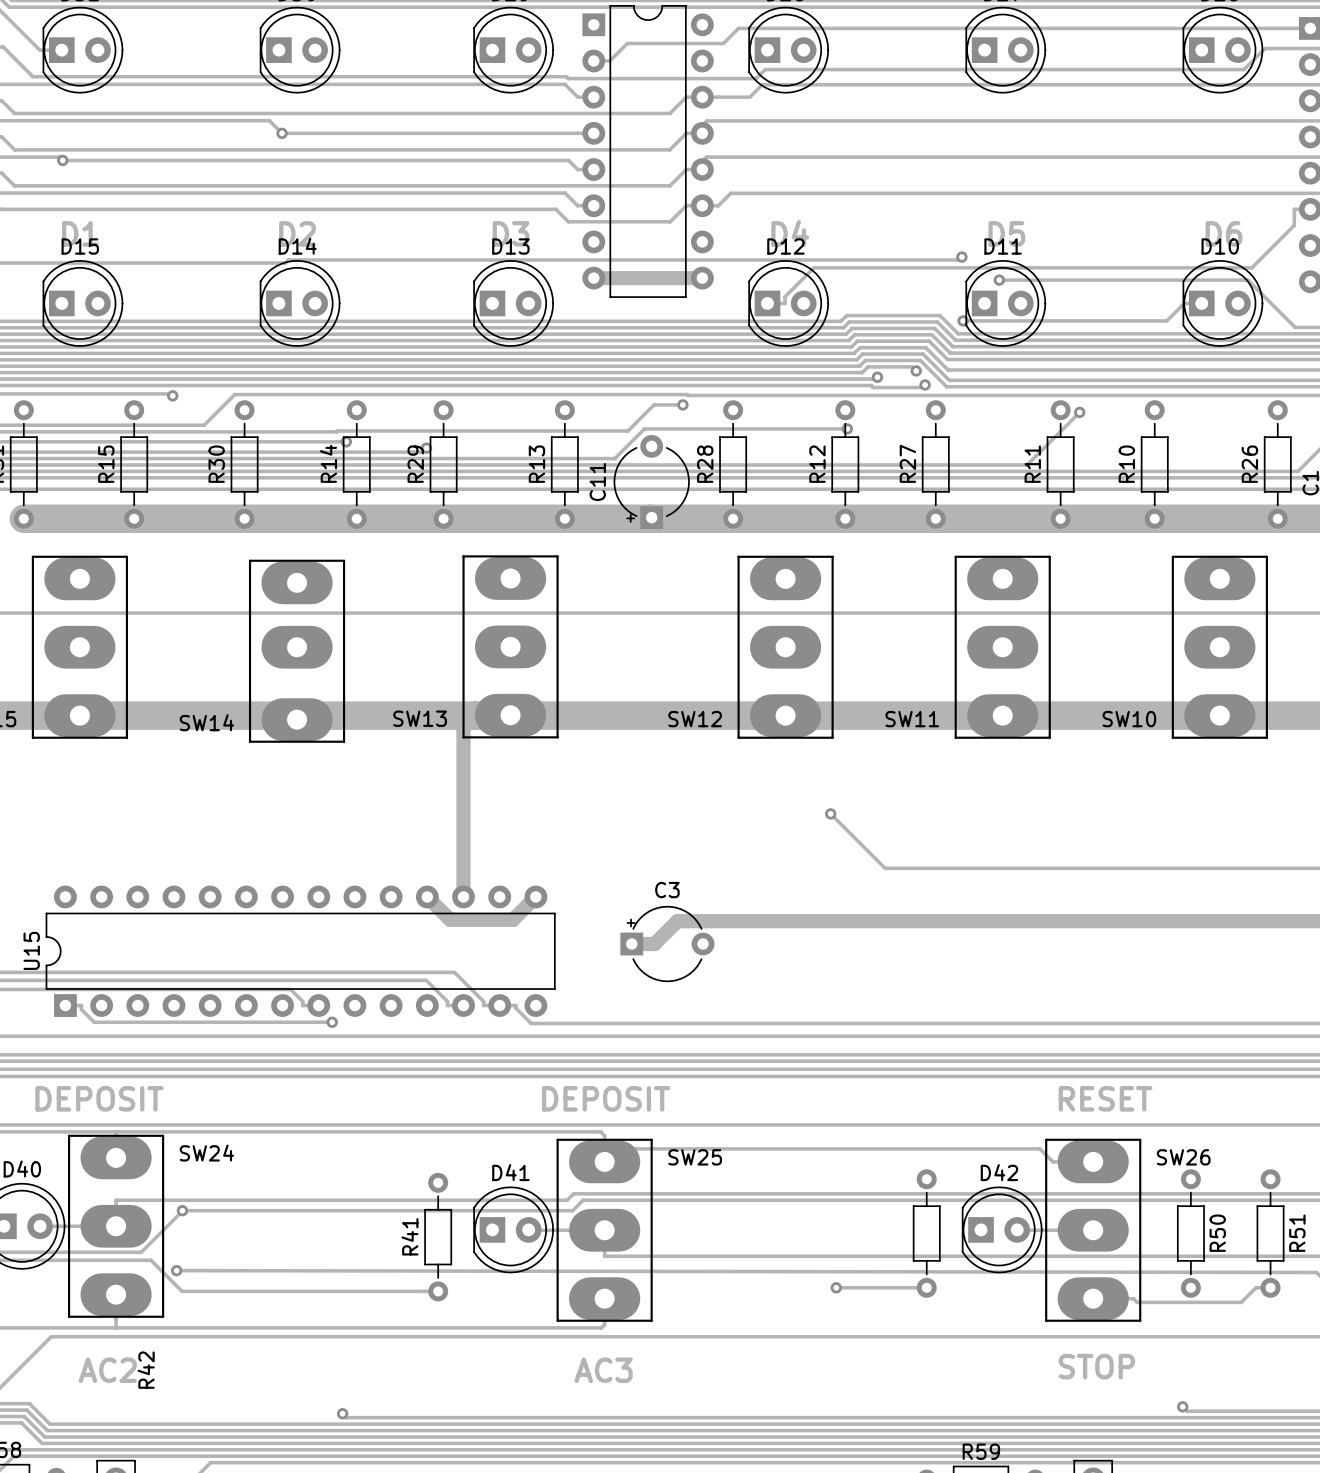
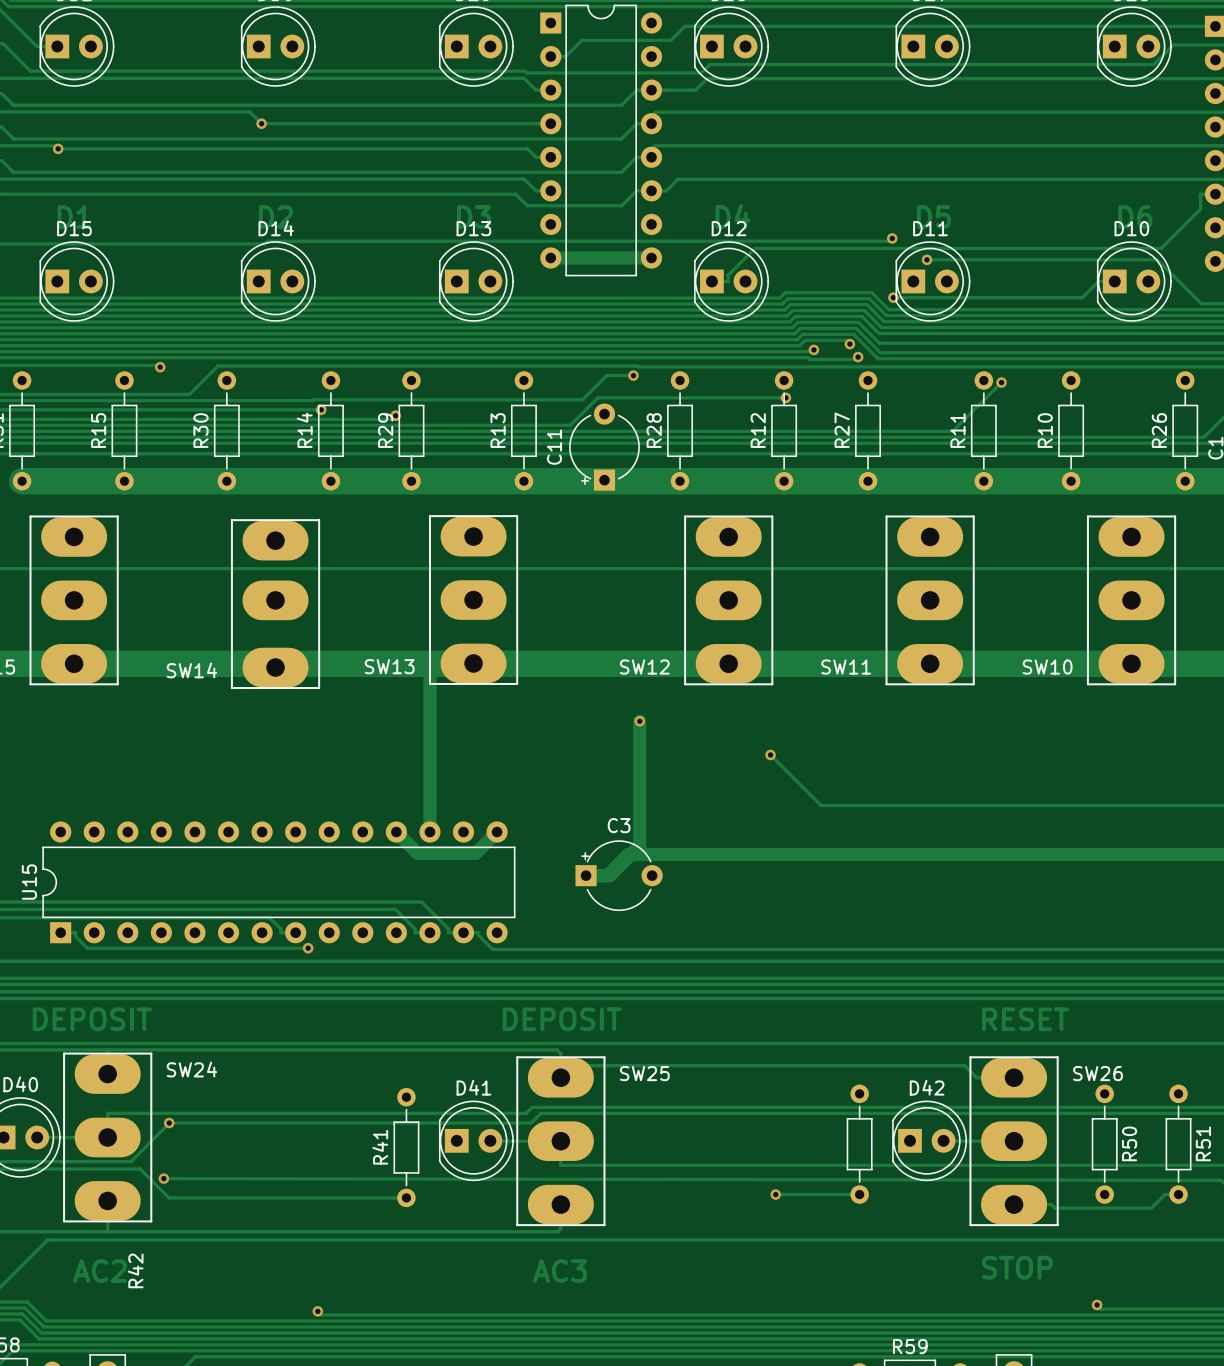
track: none -> (639, 721) (639, 845) (609, 875) (607, 875)
via: none -> (639, 721)

